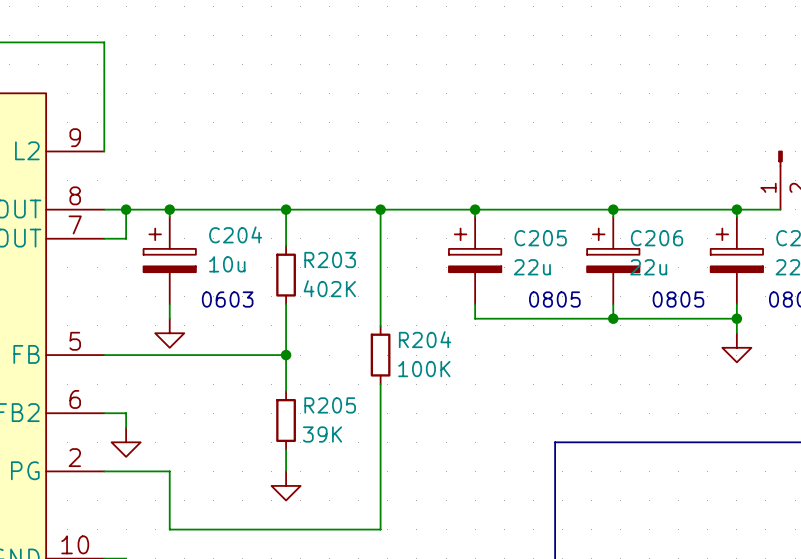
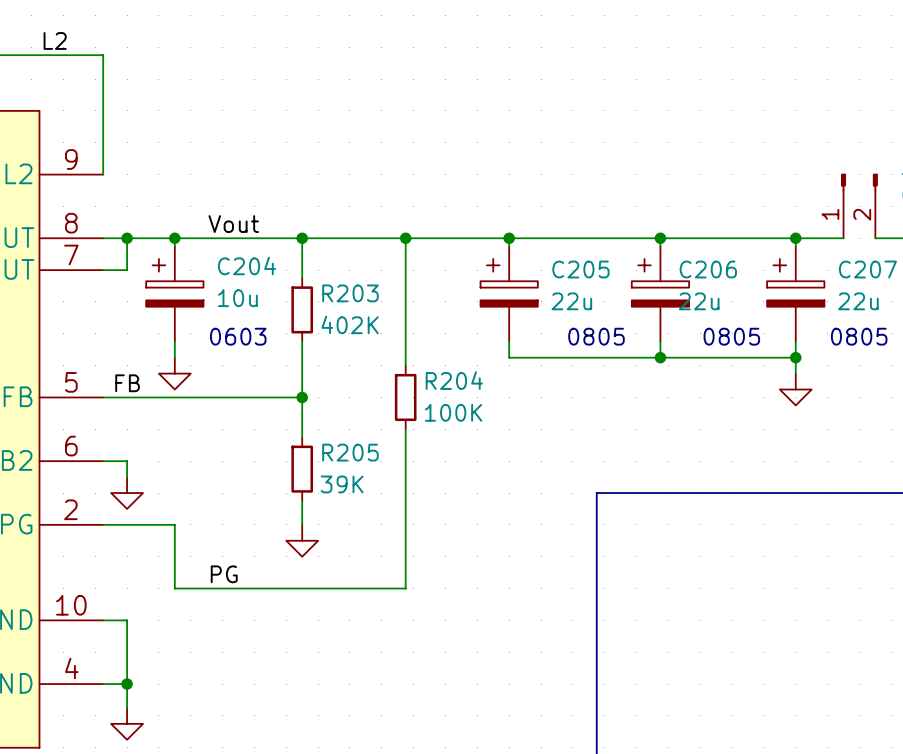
label: none -> L2 (55, 40)
label: none -> Vout (233, 224)
label: none -> FB (127, 383)
label: none -> PG (224, 574)

